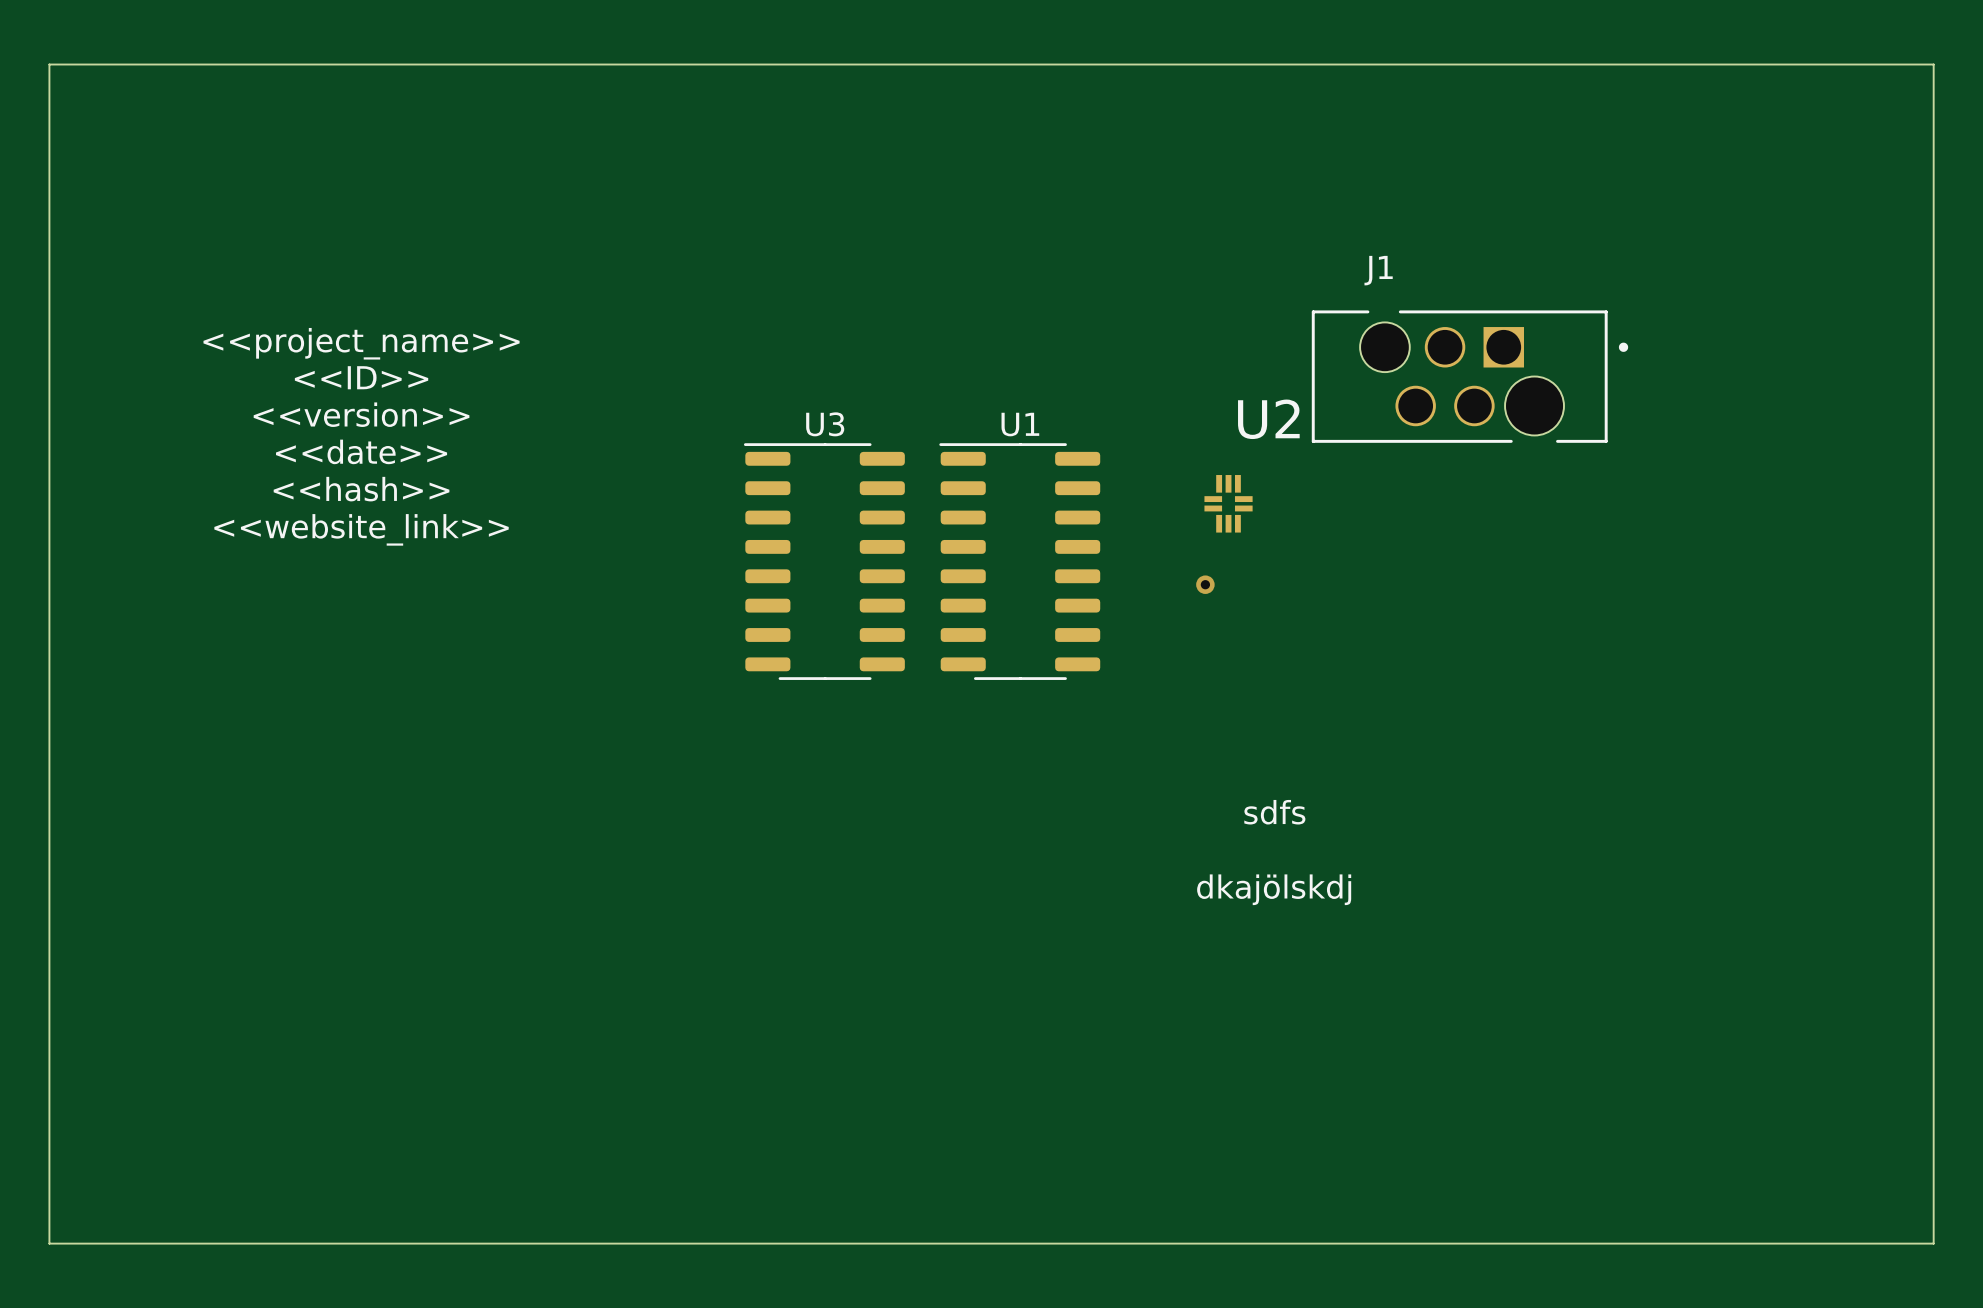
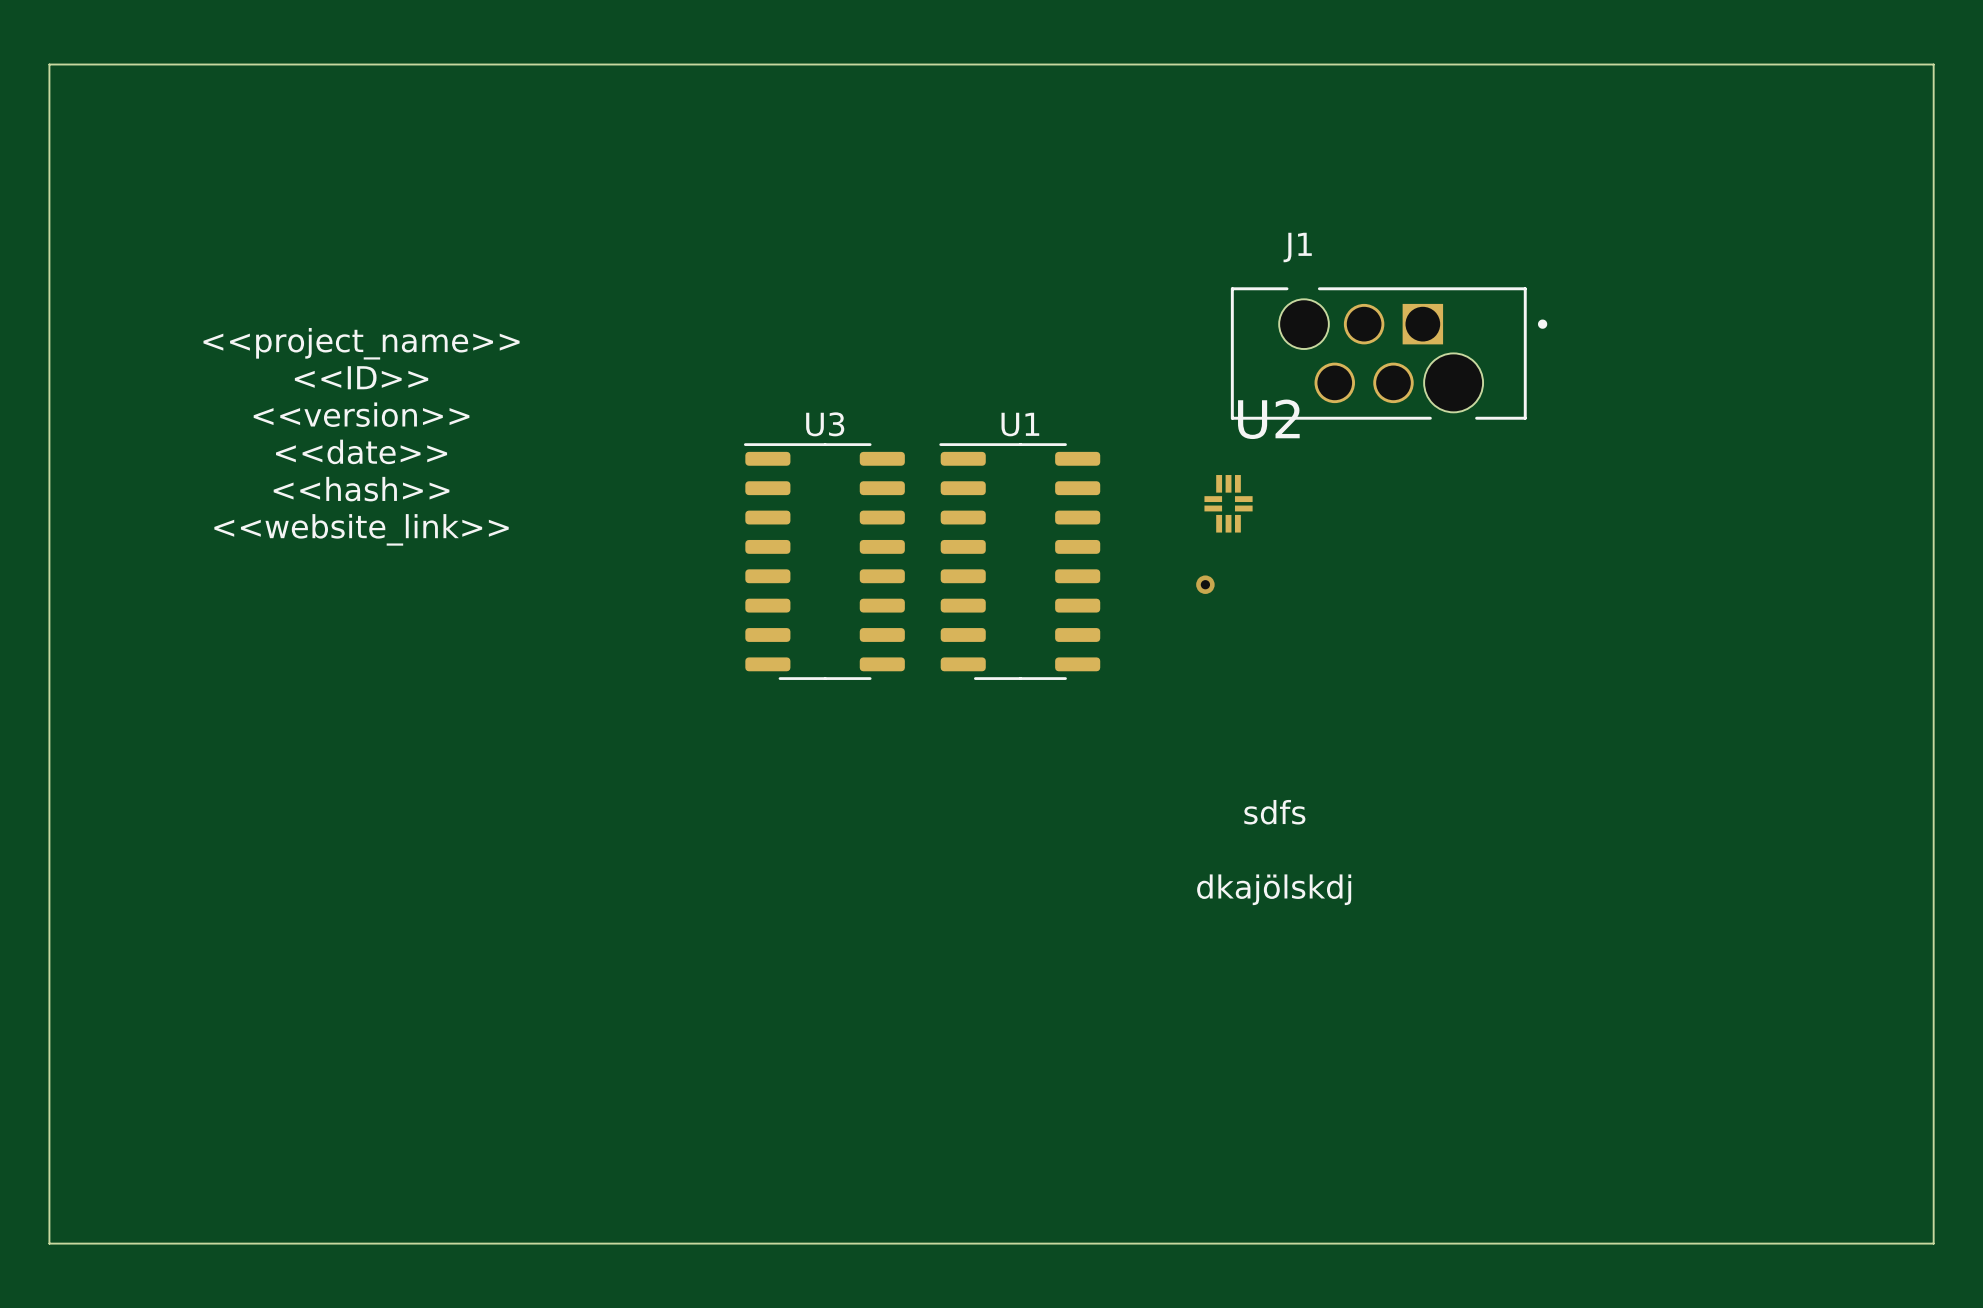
J1 position: (1469, 376) -> (1389, 353)

